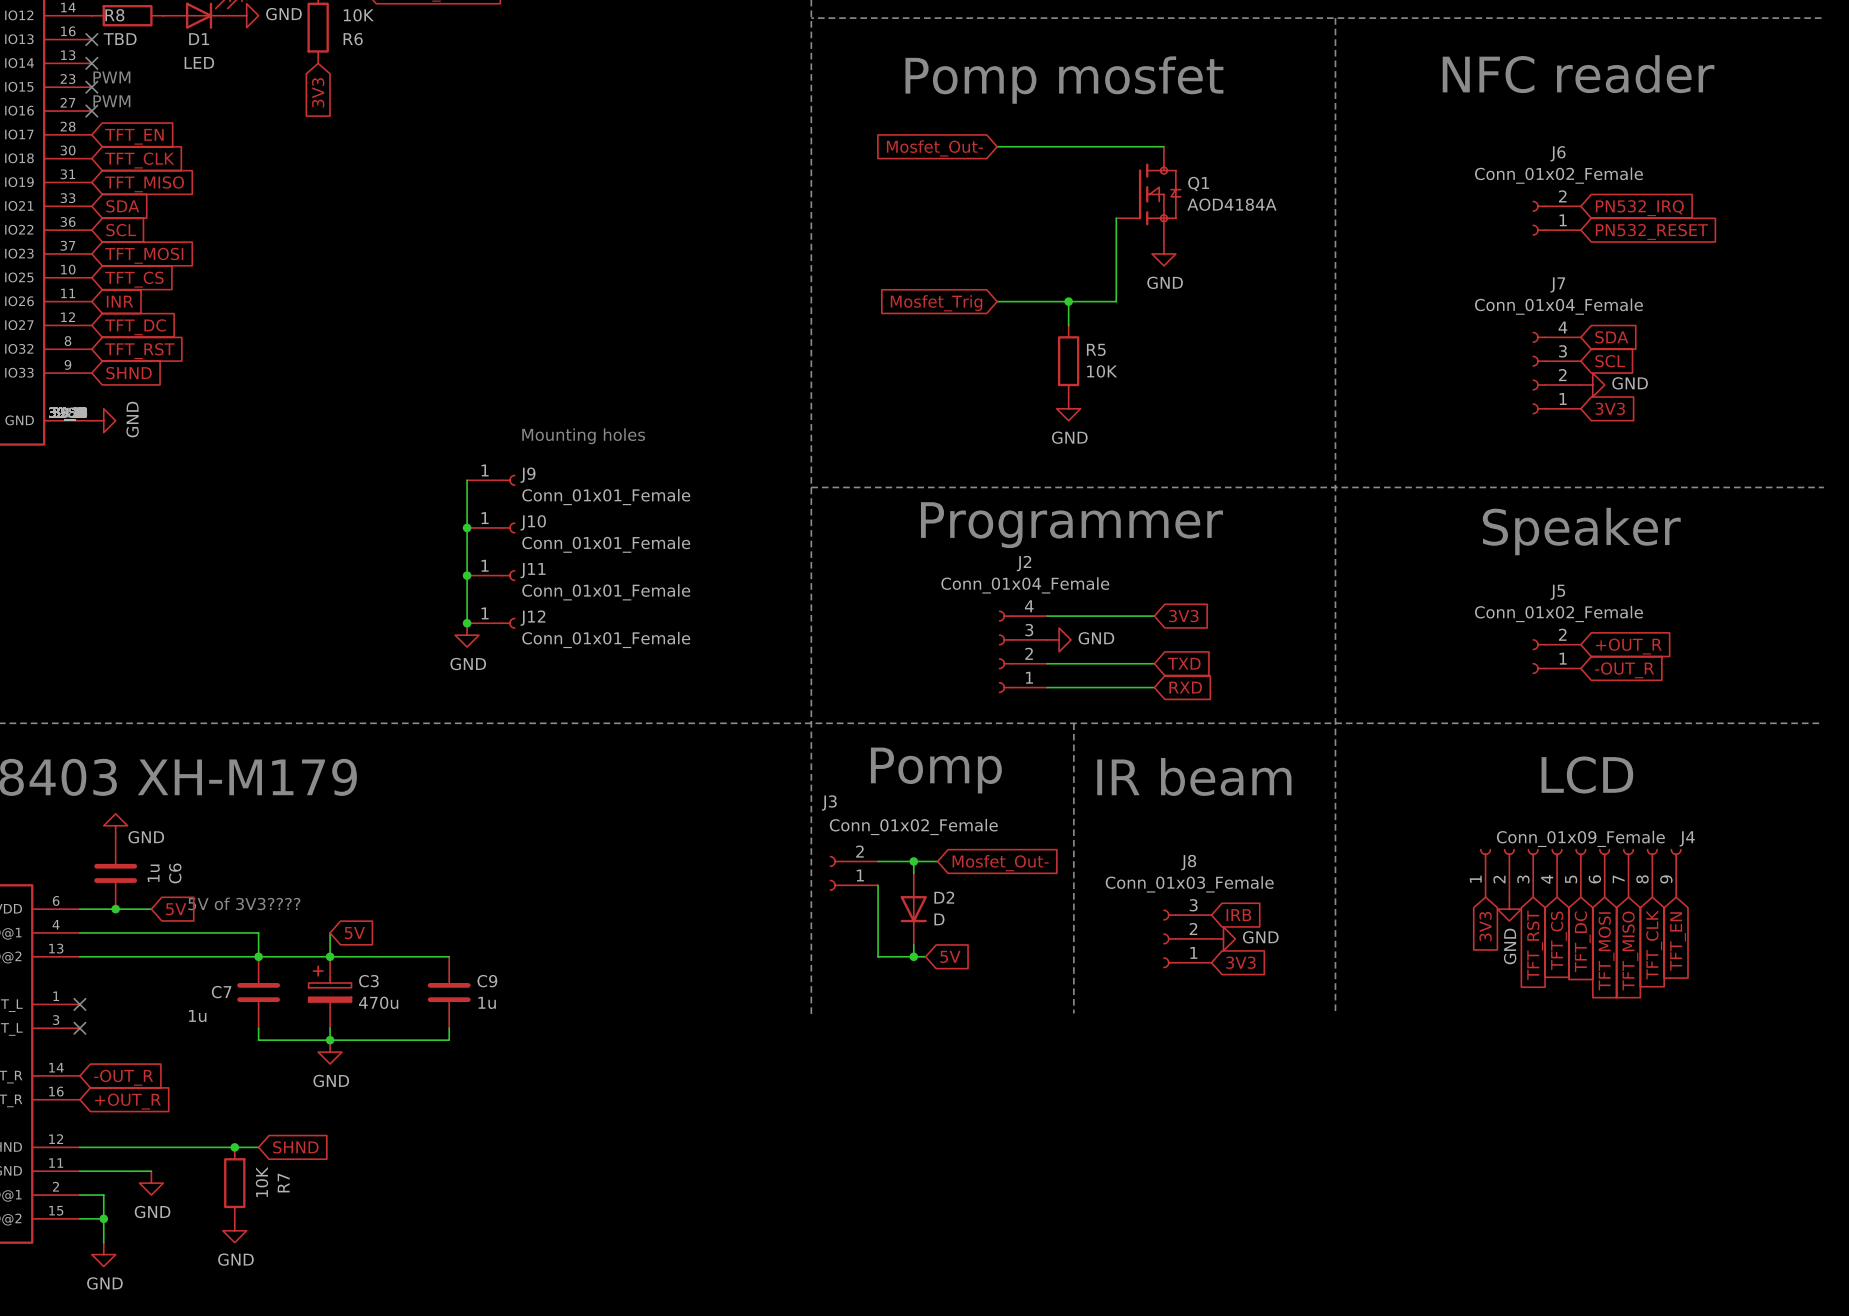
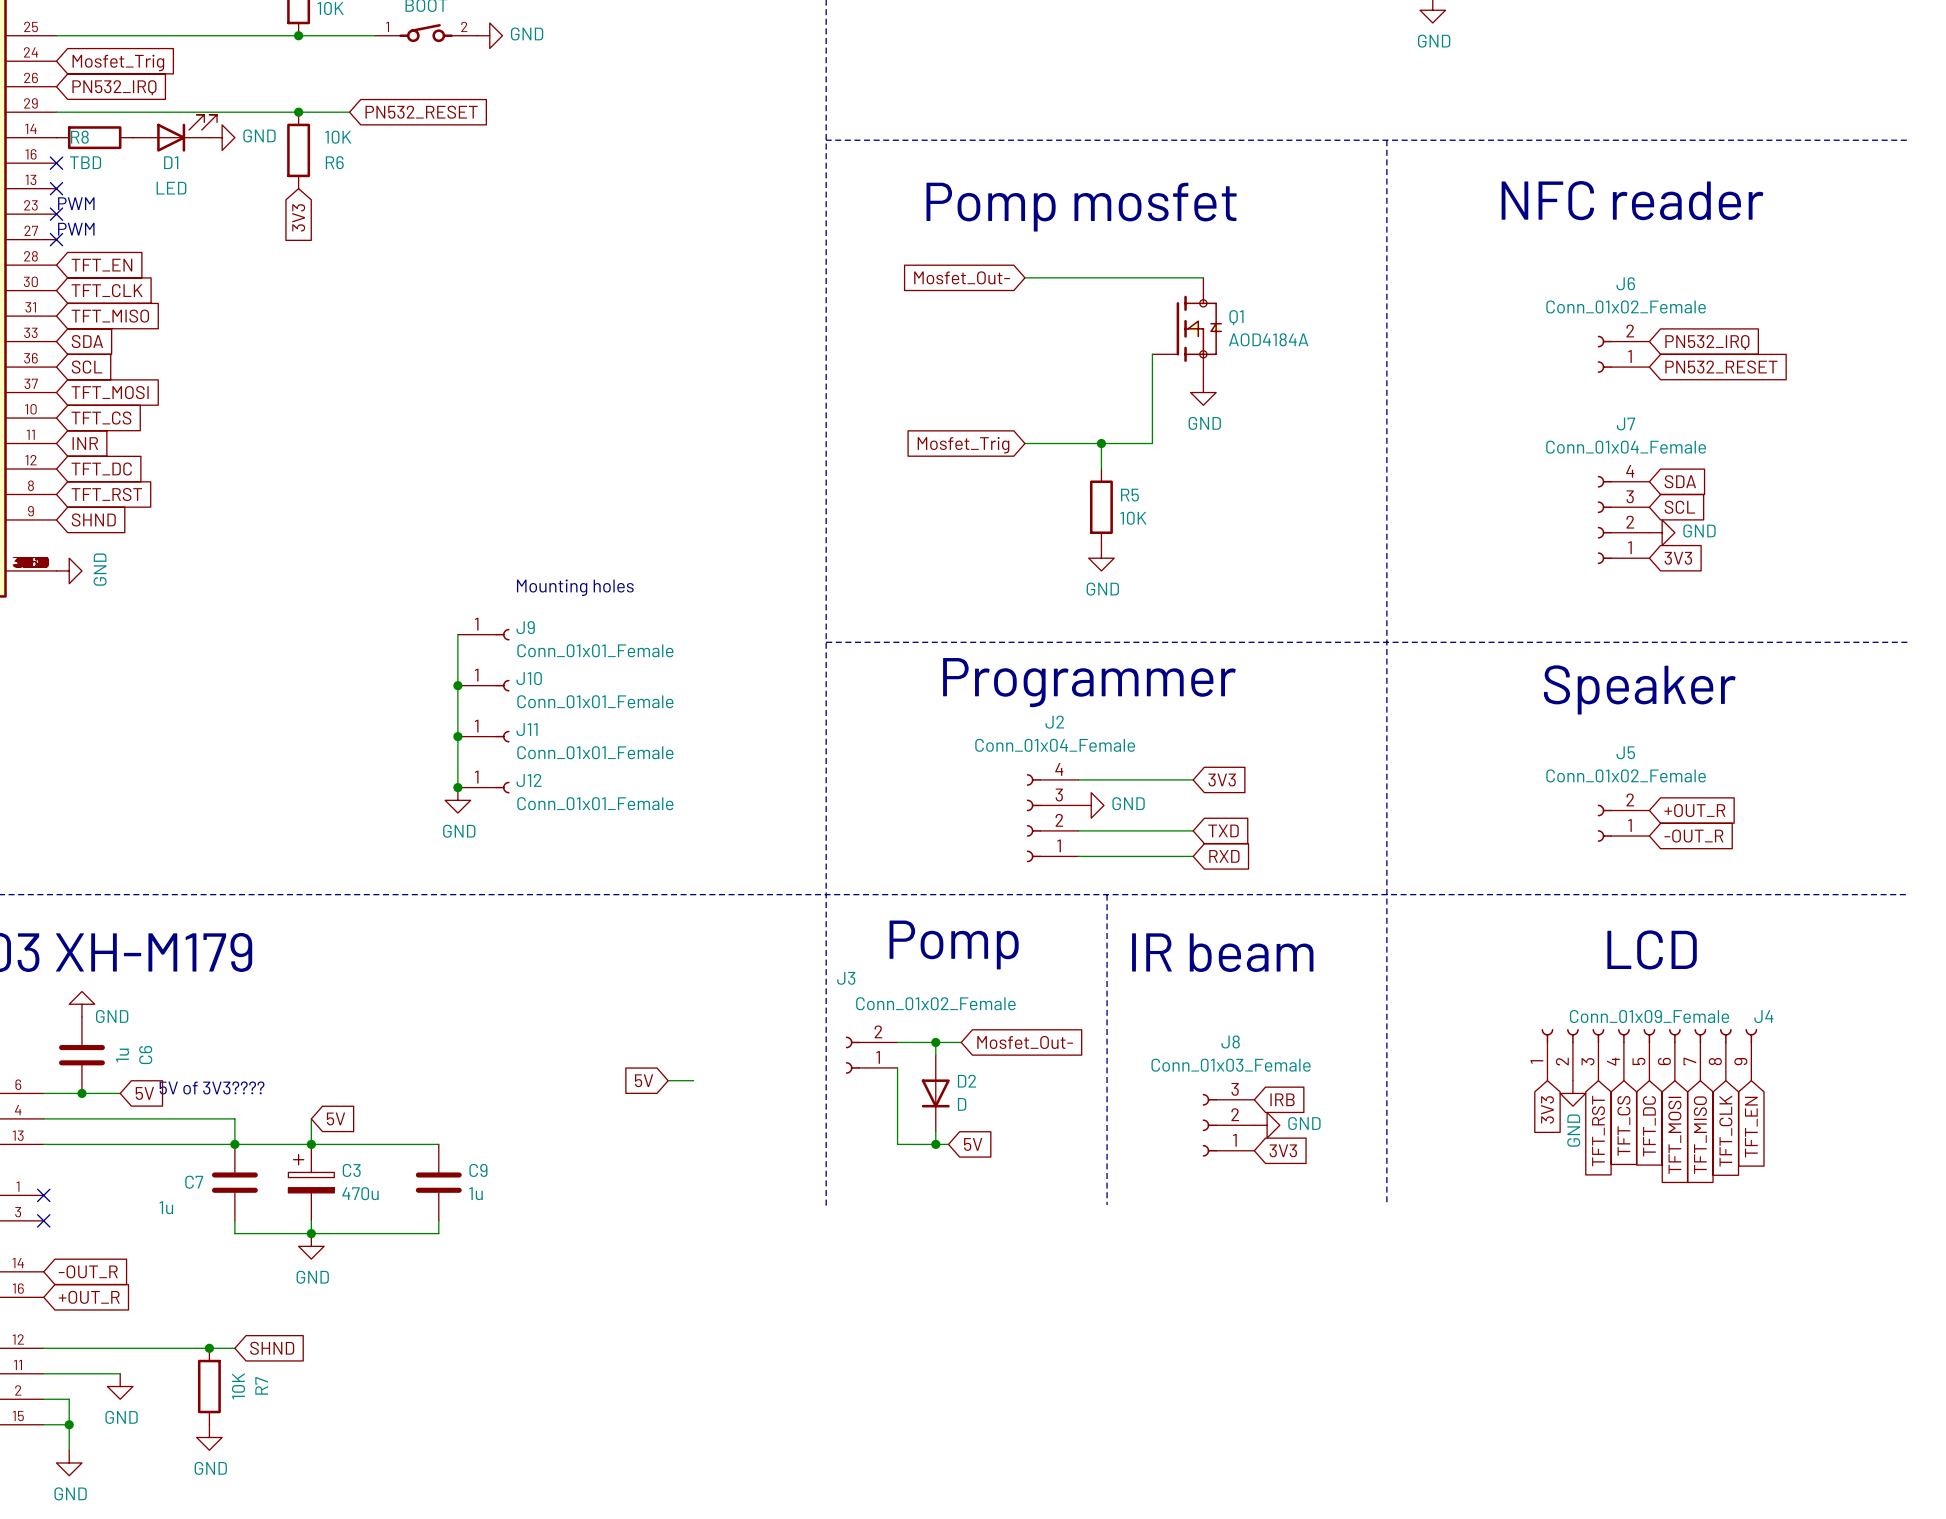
global label: none -> 5V (644, 1080)
wire: none -> (668, 1080) (693, 1080)

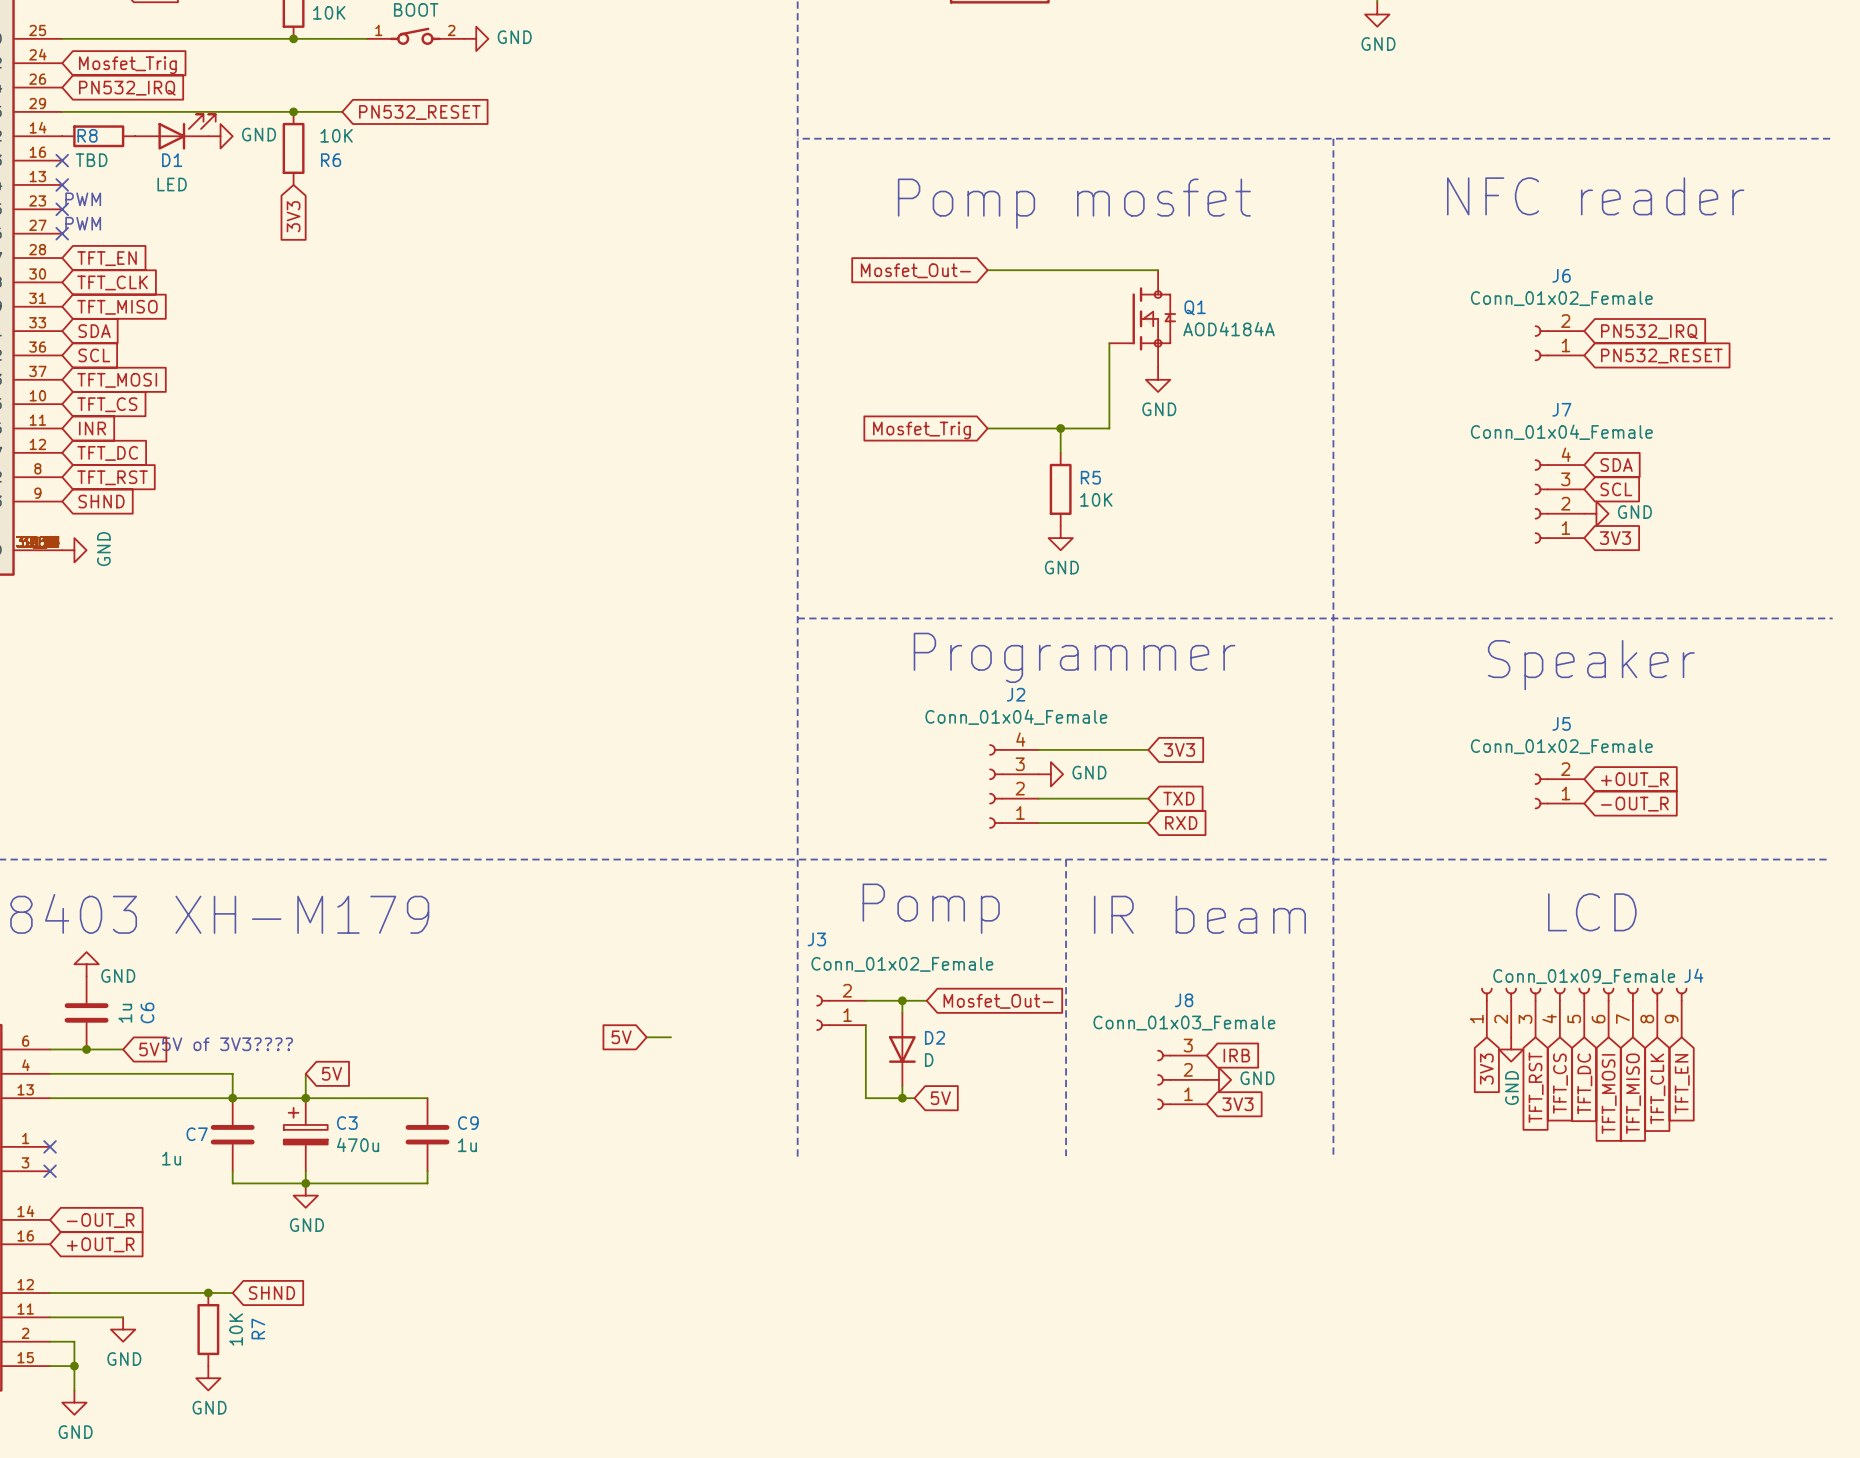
text: Mounting holes (575, 587) -> none
wire: (457, 634) (457, 787) -> none
J9: Conn_01x01_Female (483, 634) -> none
junction: (457, 685) -> none
J10: Conn_01x01_Female (483, 685) -> none
junction: (457, 736) -> none
J11: Conn_01x01_Female (483, 736) -> none
junction: (457, 787) -> none
J12: Conn_01x01_Female (483, 787) -> none
power symbol: GND (457, 800) -> none

